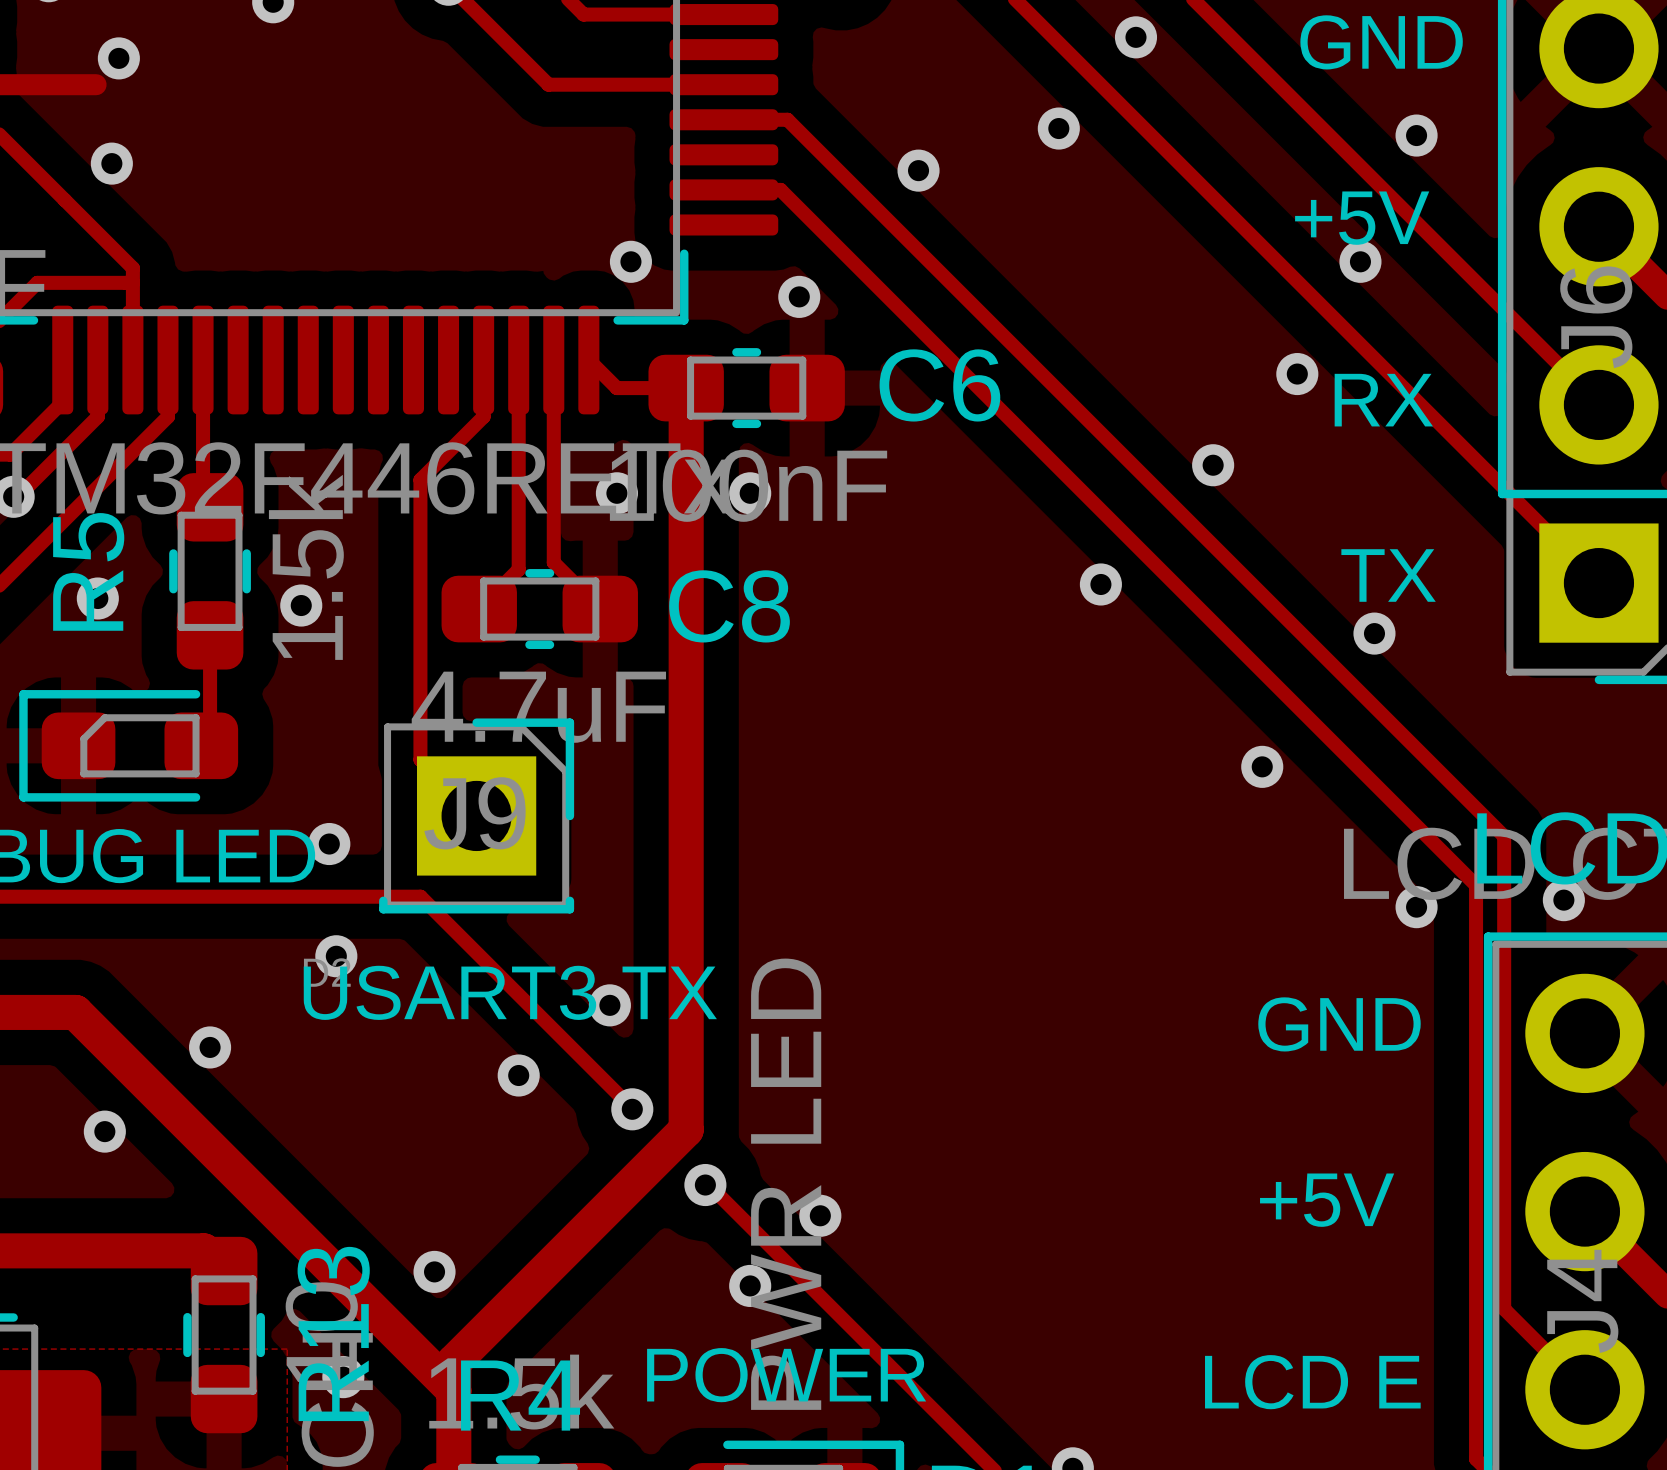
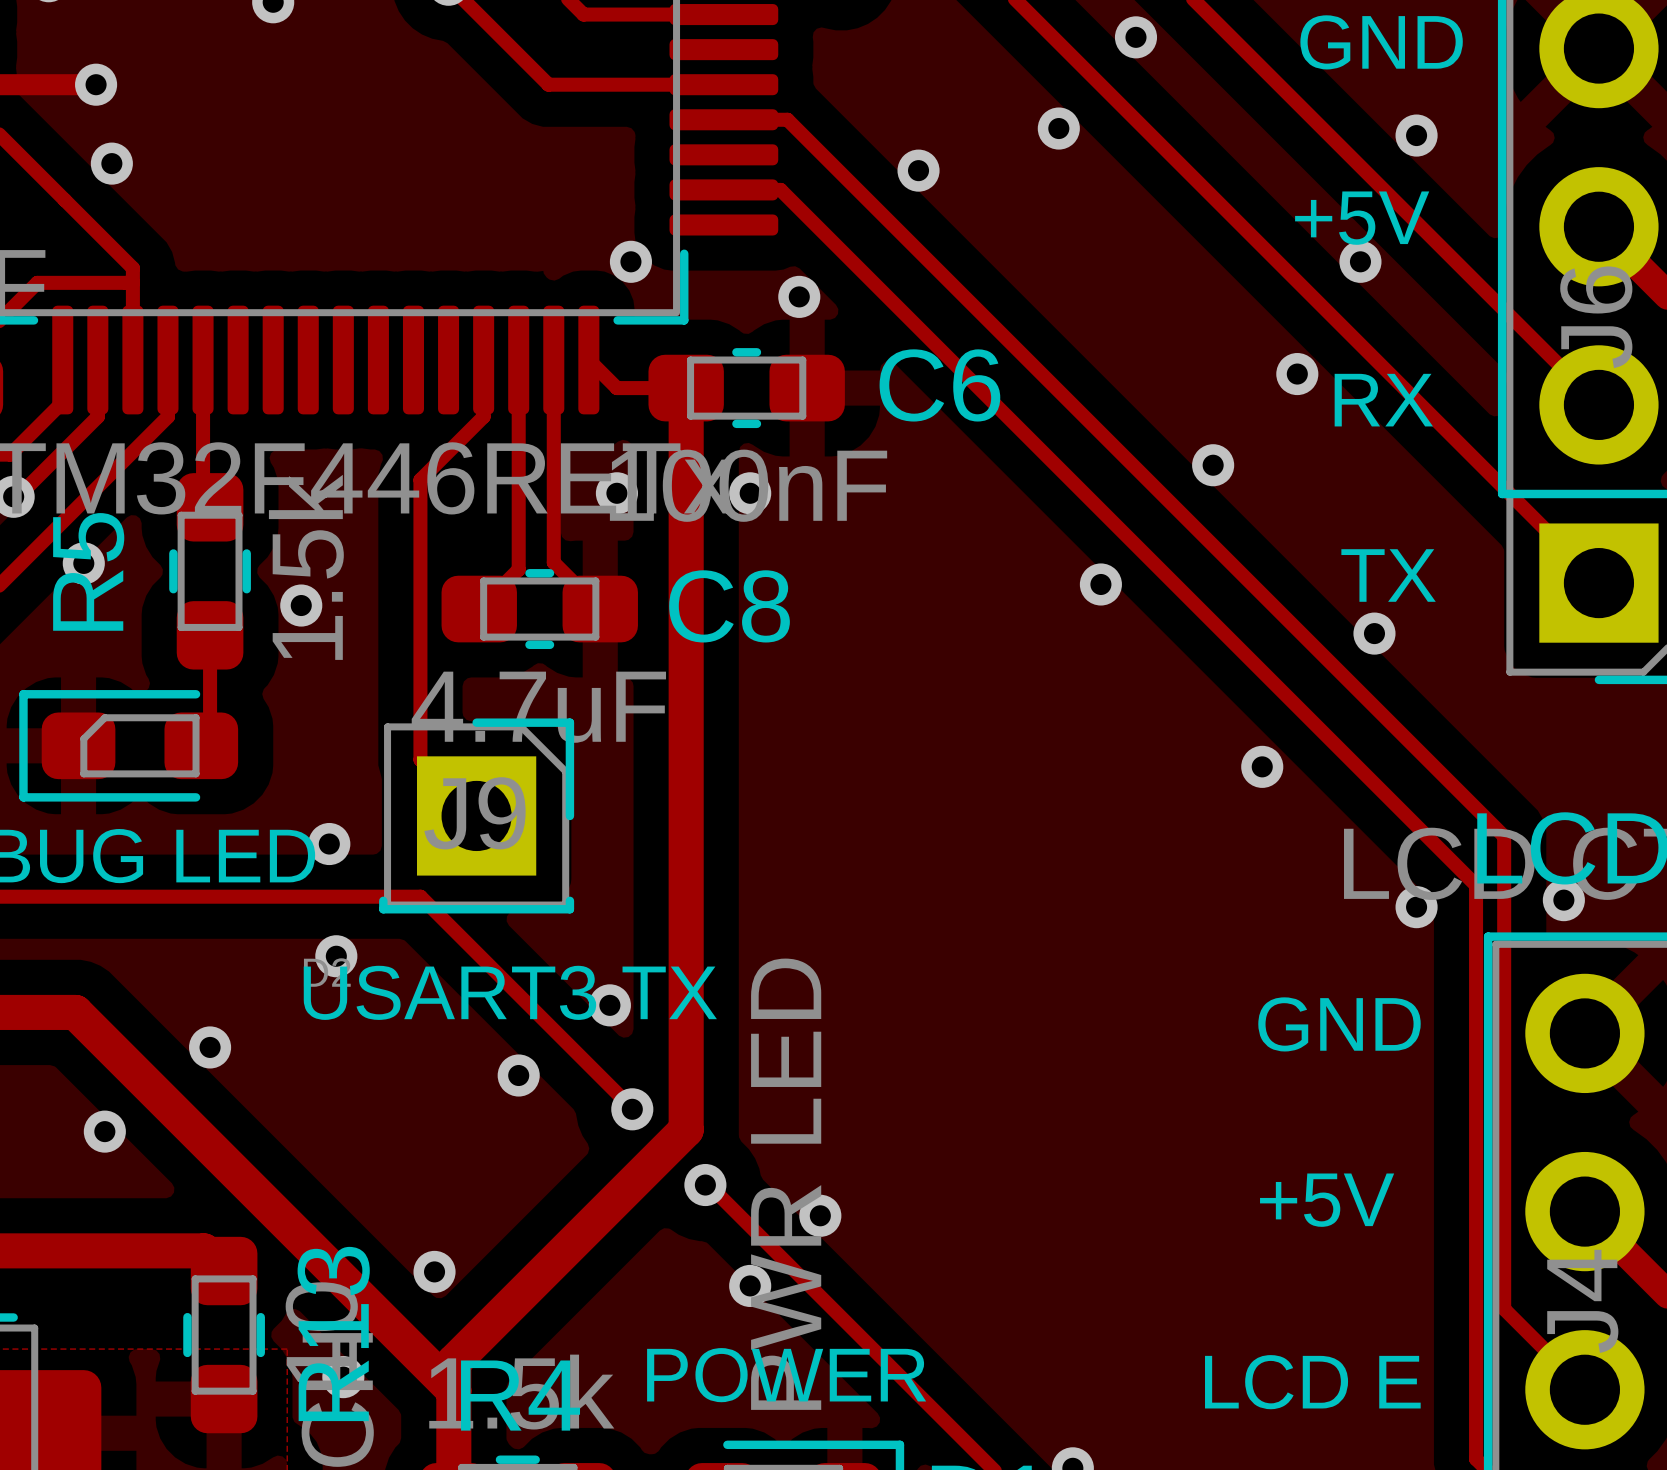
via position: (118, 58) -> (96, 84)
via position: (97, 598) -> (83, 563)

